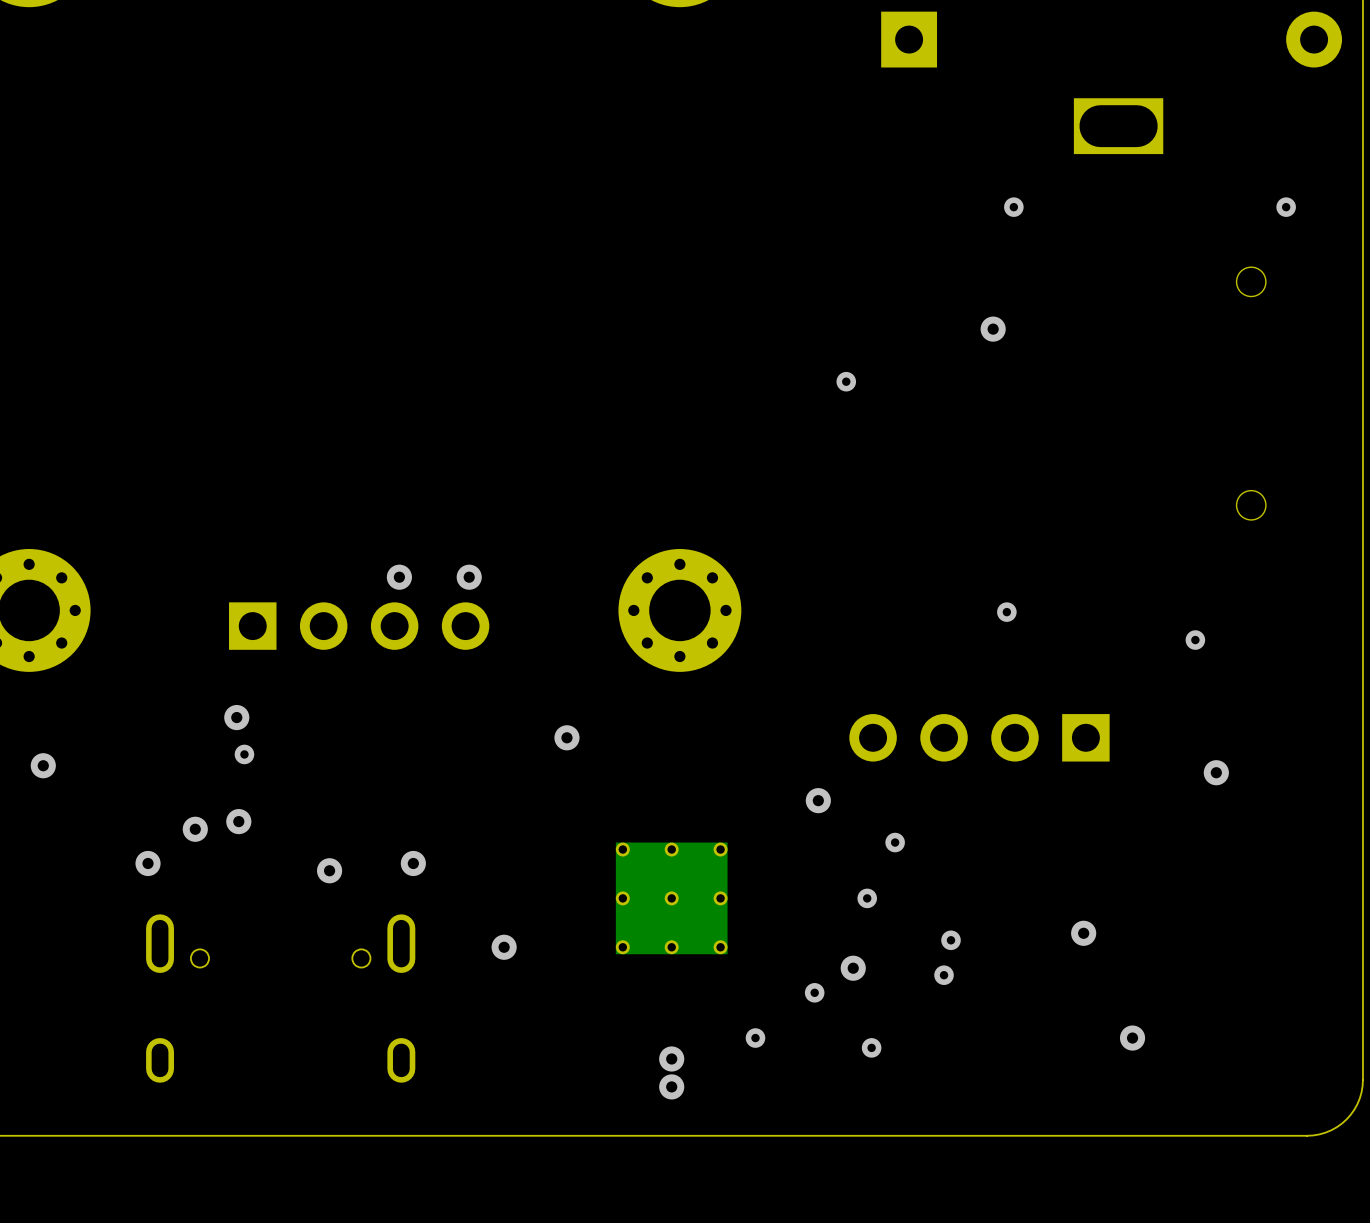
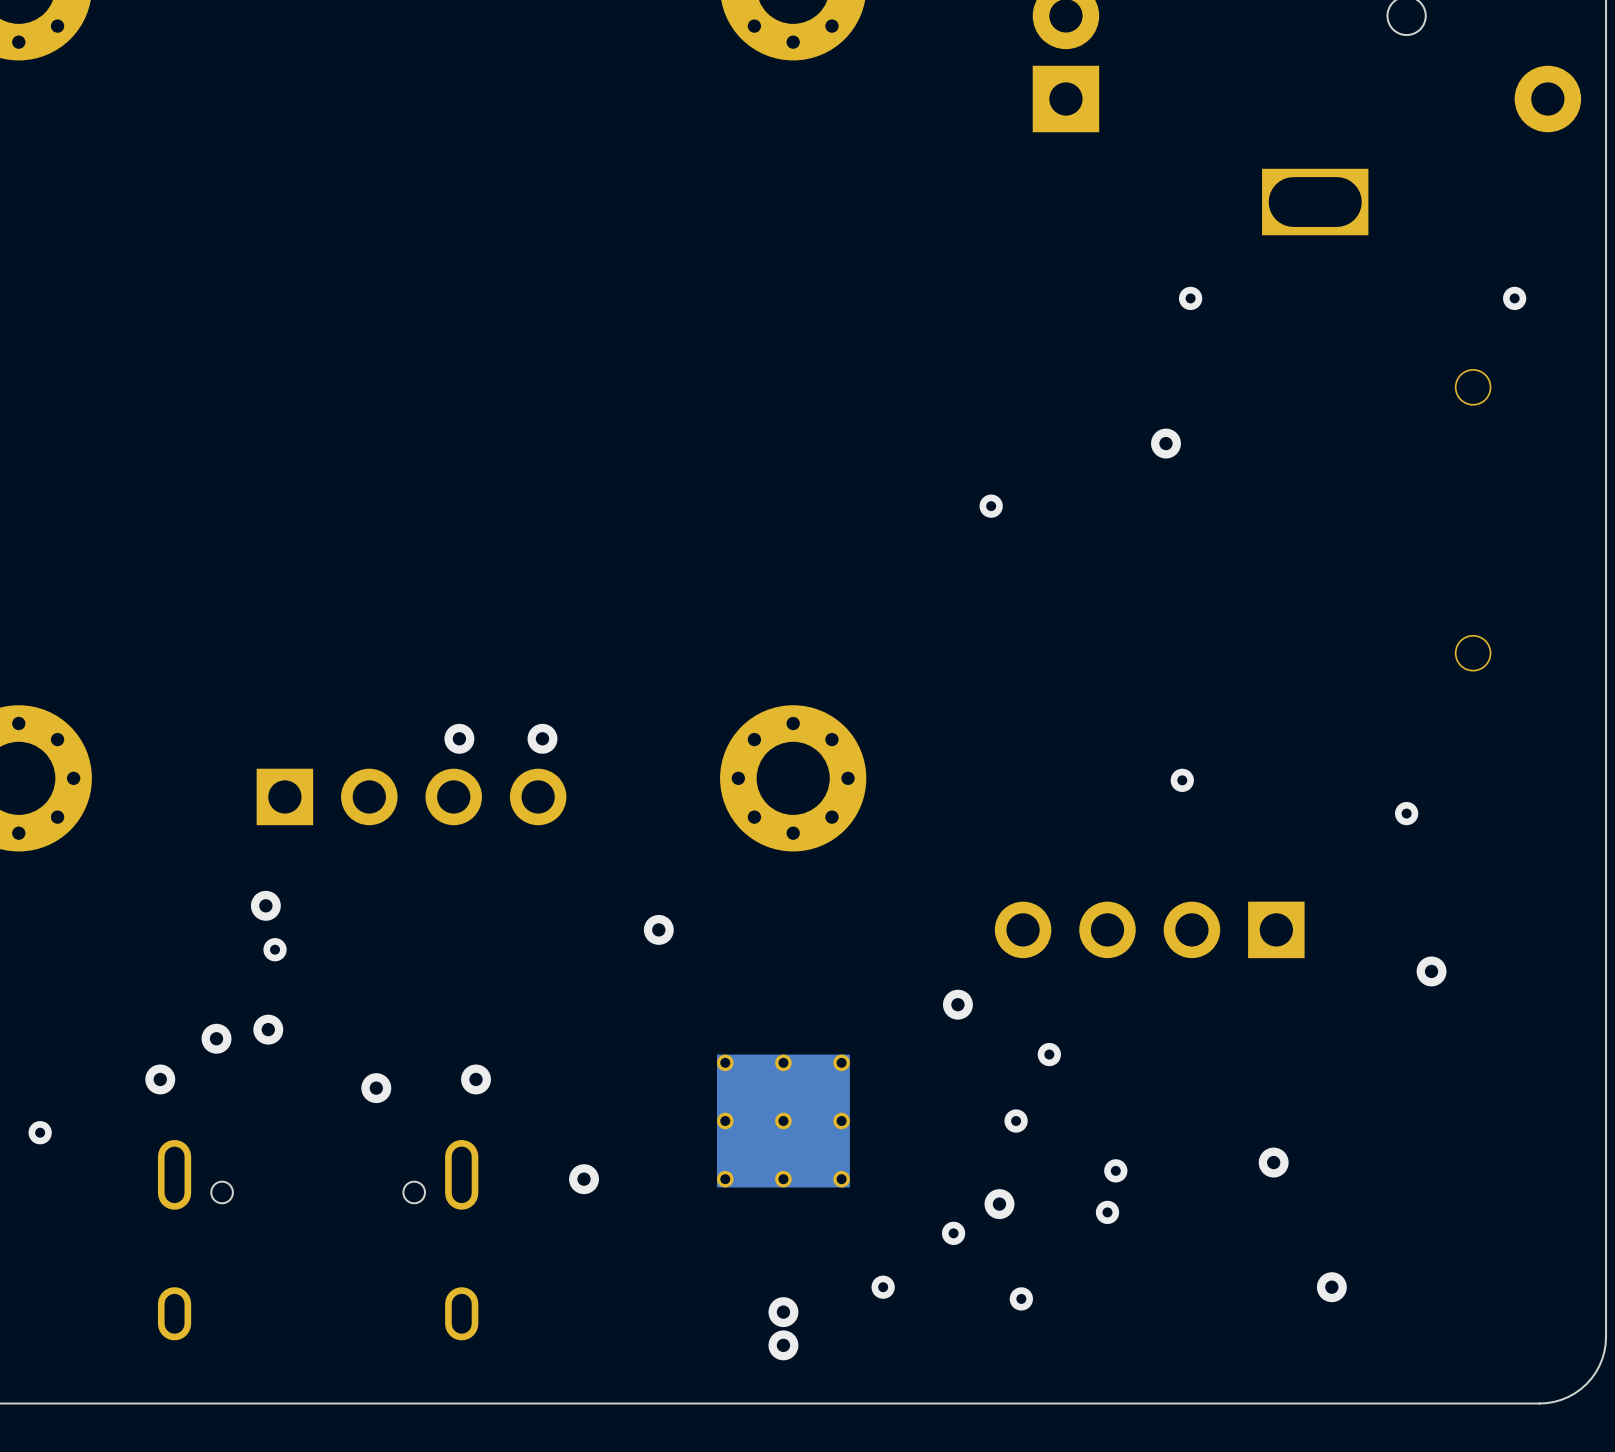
via: (43, 765) -> none
via: none -> (40, 1132)

